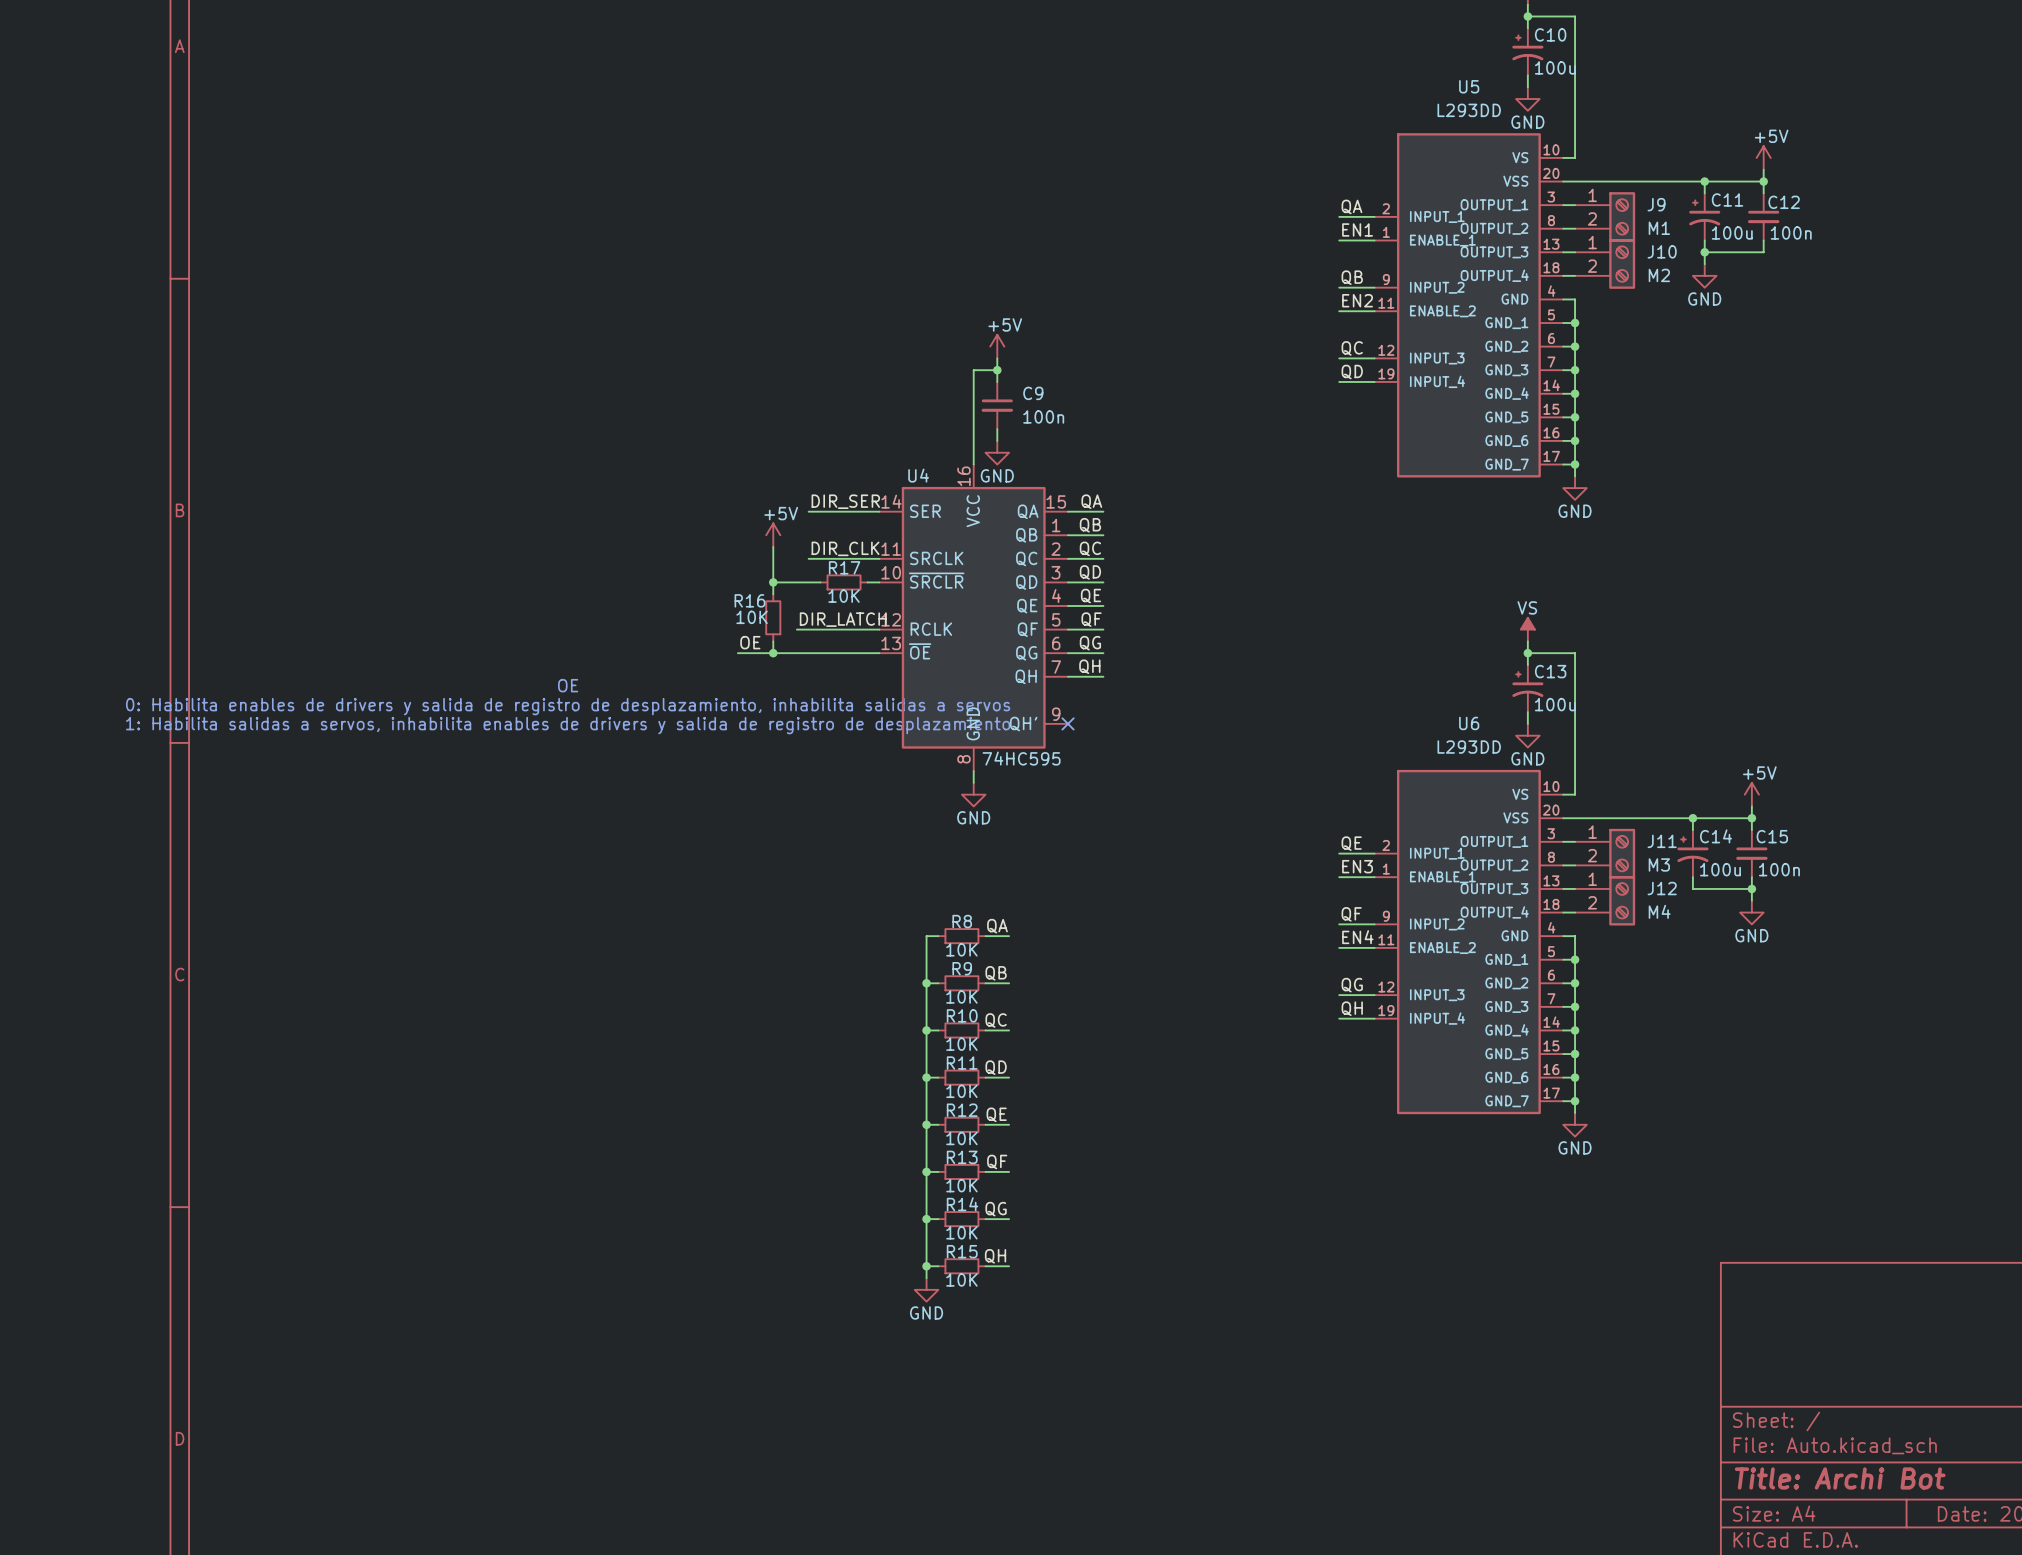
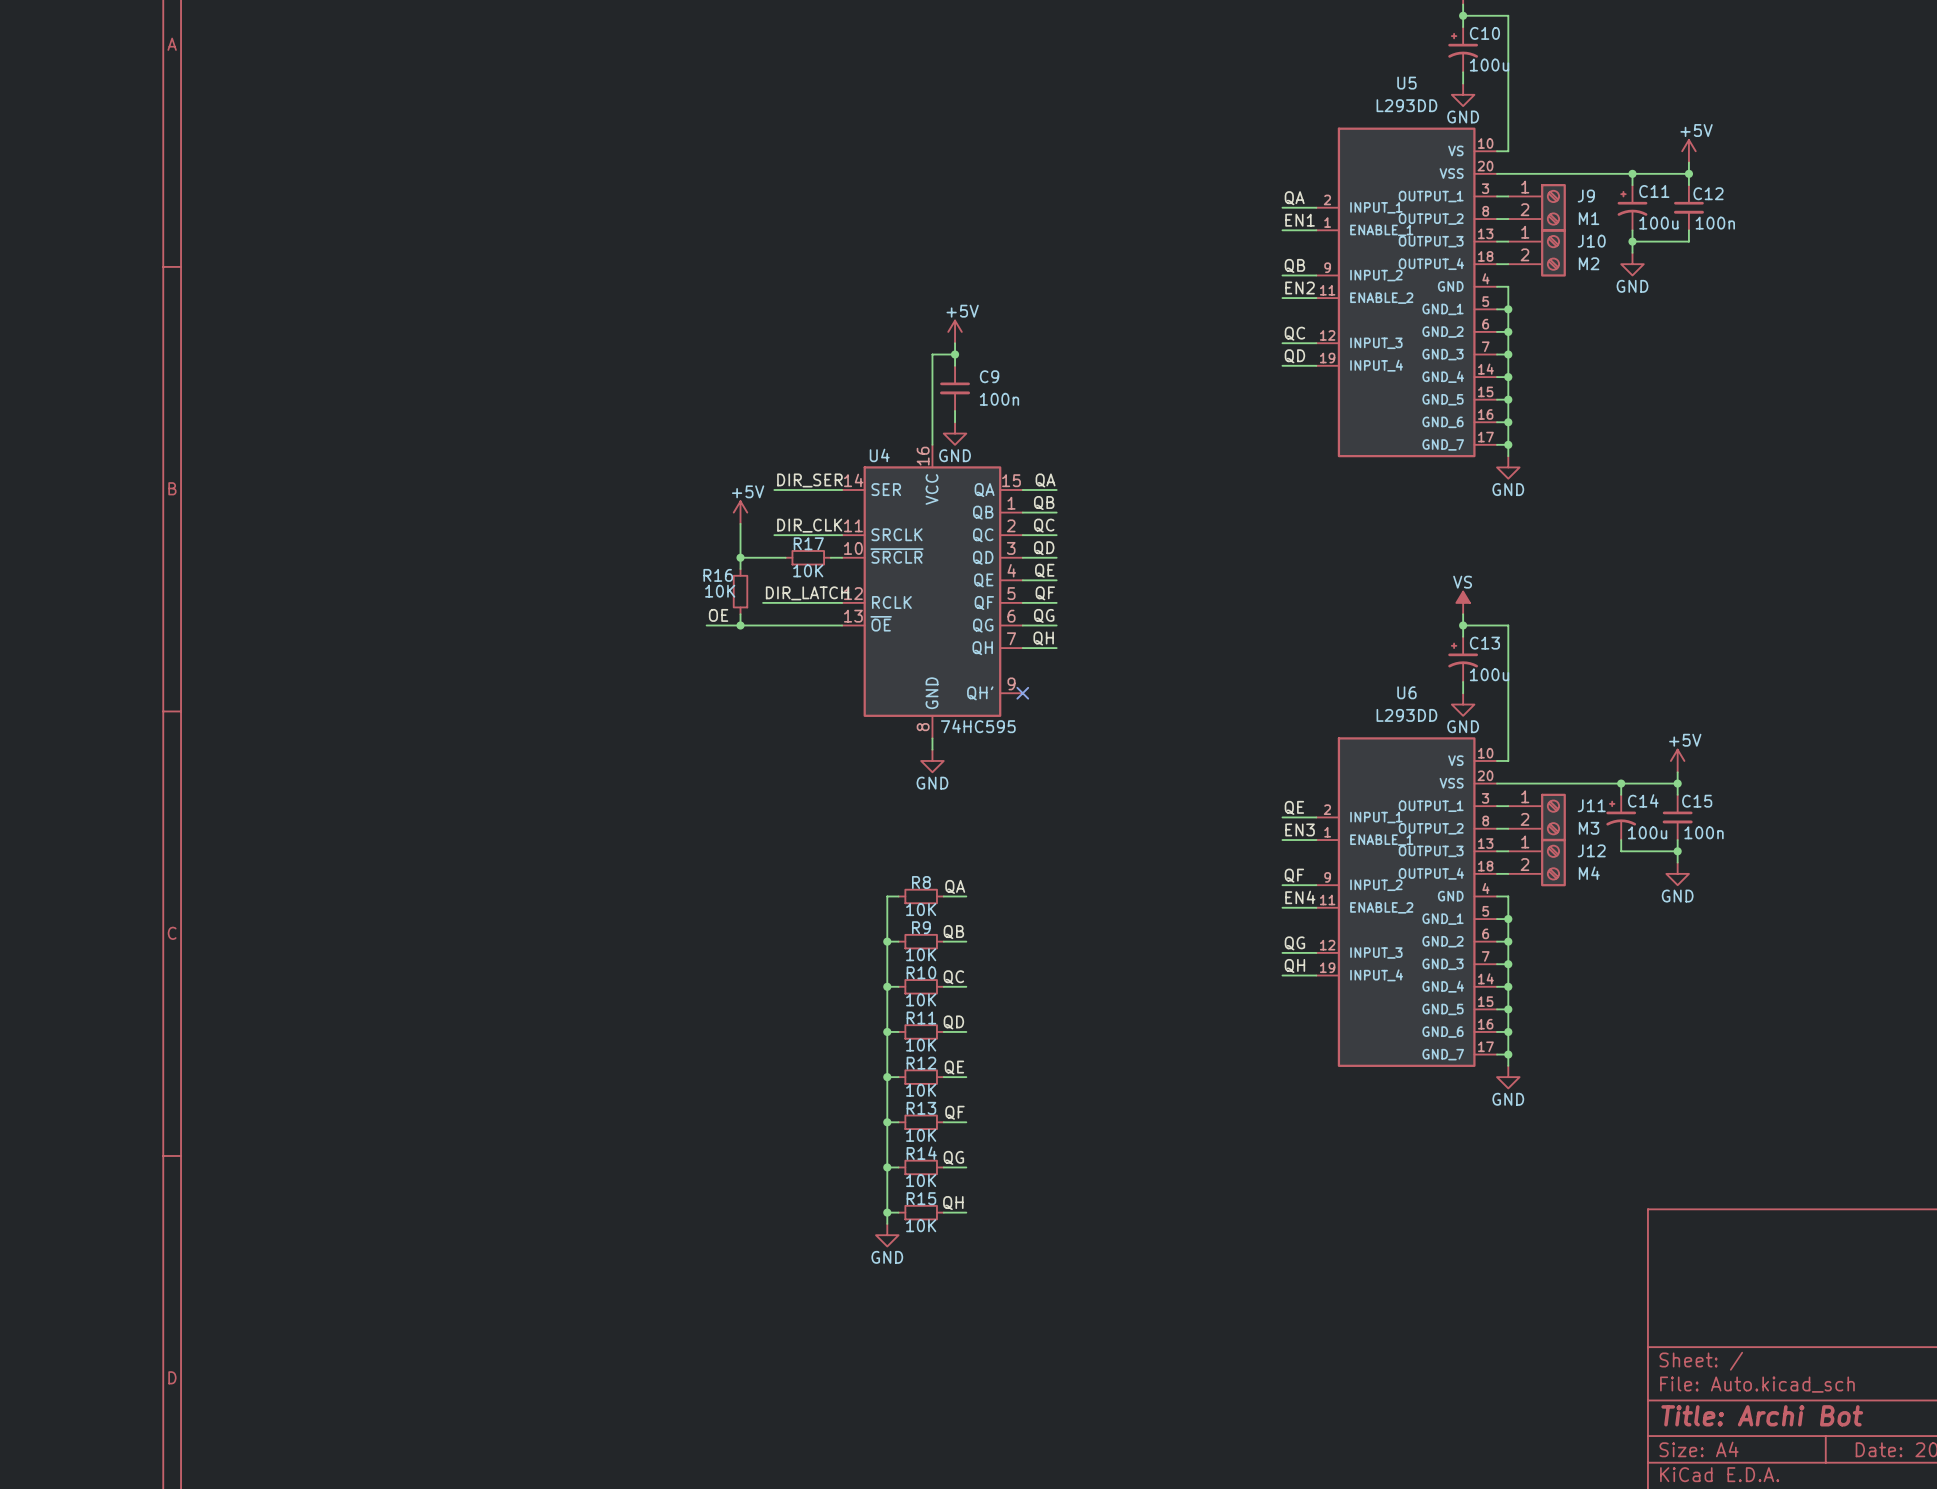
text: OE (568, 685) -> none
text: 0: Habilita enables de drivers y salida de registro de desplazamiento, inhabilita salidas a servos (568, 706) -> none
text: 1: Habilita salidas a servos, inhabilita enables de drivers y salida de registro de desplazamiento (568, 725) -> none

